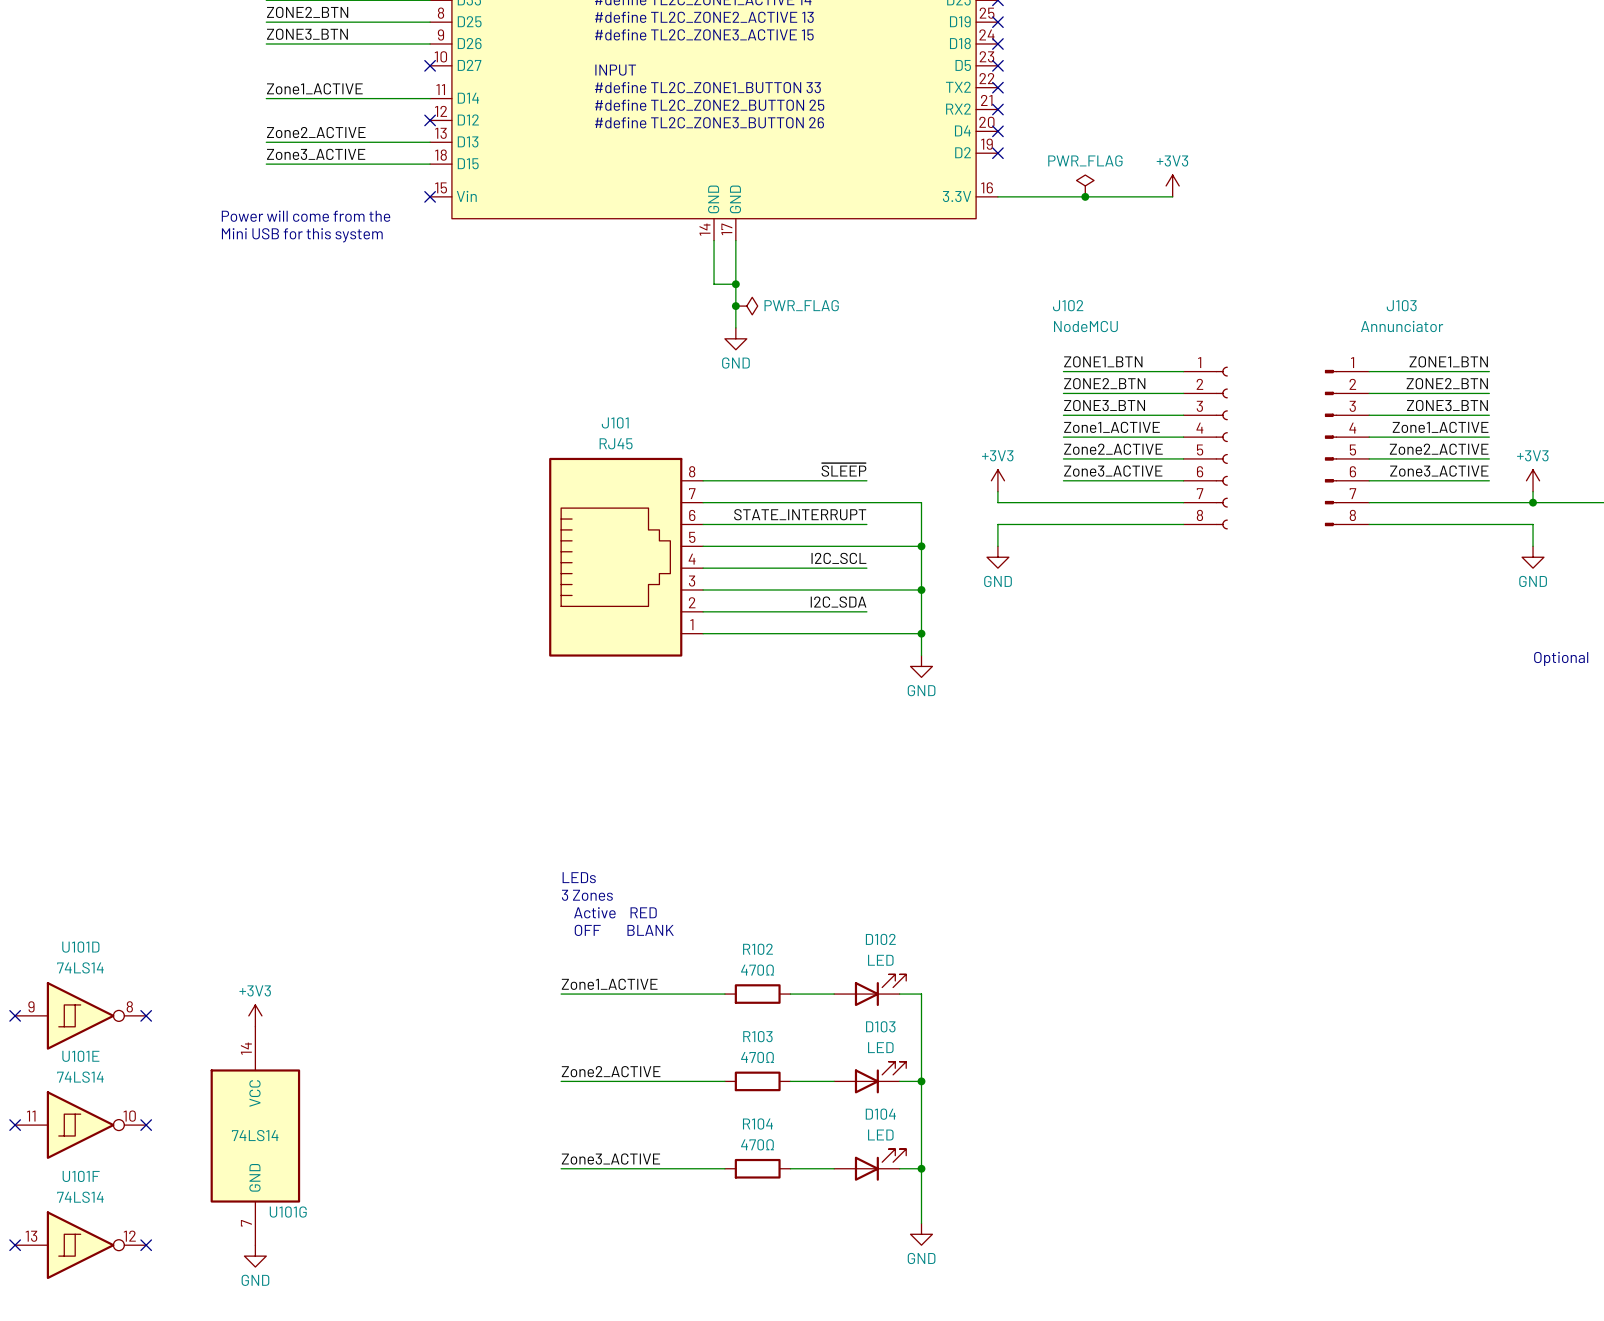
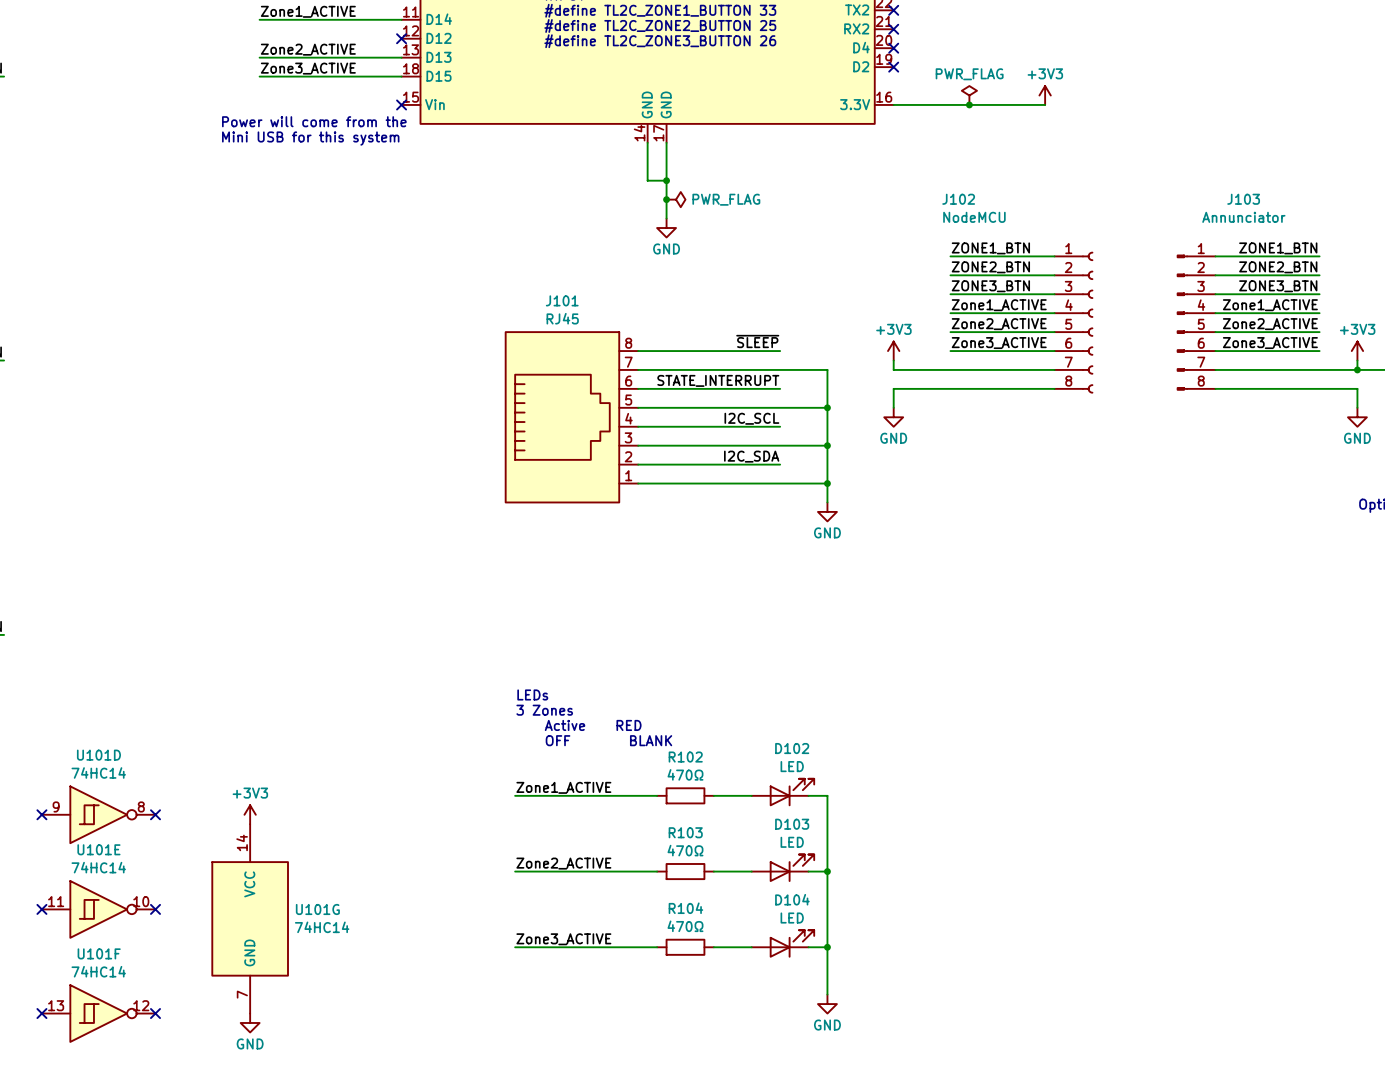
U101D value: 74LS14 (80, 967) -> 74HC14 (98, 772)
U101E value: 74LS14 (80, 1077) -> 74HC14 (98, 867)
U101G value: 74LS14 (255, 1135) -> 74HC14 (322, 927)
U101F value: 74LS14 (80, 1197) -> 74HC14 (98, 971)
U101G name position: U101G (288, 1212) -> U101G (317, 909)

